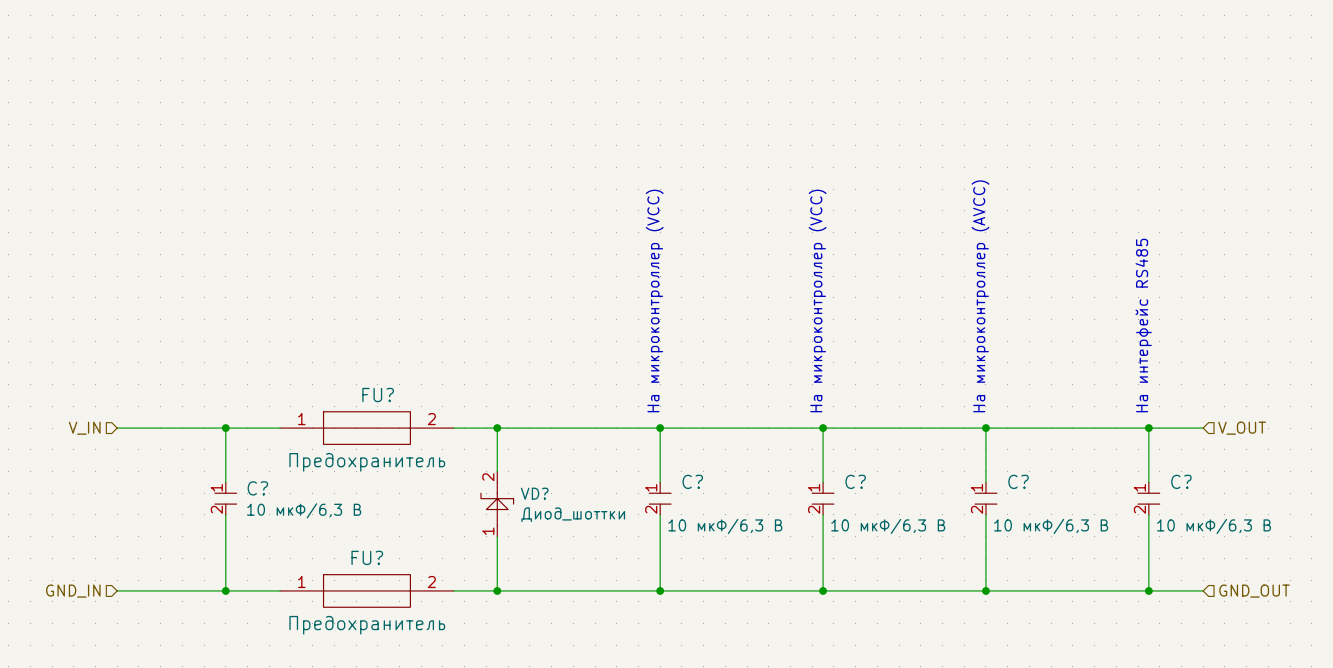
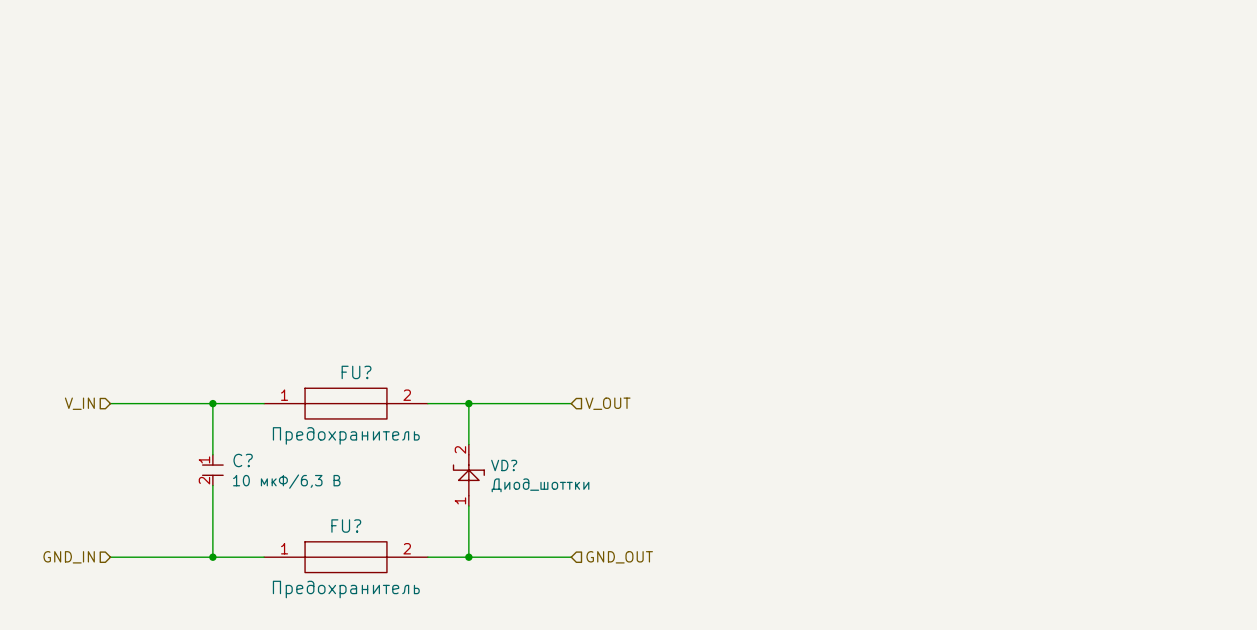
text: На микроконтроллер (AVCC) (980, 296) -> none
text: На микроконтроллер (VCC) (654, 300) -> none
text: На микроконтроллер (VCC) (817, 300) -> none
text: На интерфейс RS485 (1143, 325) -> none
wire: (605, 428) (1203, 428) -> none
hierarchical label: none -> V_OUT (607, 403)
wire: (660, 428) (660, 482) -> none
junction: (660, 428) -> none
wire: (823, 428) (823, 482) -> none
junction: (823, 428) -> none
wire: (985, 428) (985, 482) -> none
junction: (985, 428) -> none
wire: (1148, 428) (1148, 482) -> none
junction: (1148, 428) -> none
hierarchical label: V_OUT (1242, 428) -> none
C?: (660, 498) -> none
C?: (823, 498) -> none
C?: (985, 498) -> none
C?: (1148, 498) -> none
wire: (660, 514) (660, 590) -> none
wire: (823, 514) (823, 590) -> none
wire: (985, 514) (985, 590) -> none
wire: (1148, 514) (1148, 590) -> none
wire: (605, 590) (1203, 590) -> none
junction: (660, 590) -> none
junction: (823, 590) -> none
junction: (985, 590) -> none
junction: (1148, 590) -> none
hierarchical label: none -> GND_OUT (619, 557)
hierarchical label: GND_OUT (1254, 591) -> none

